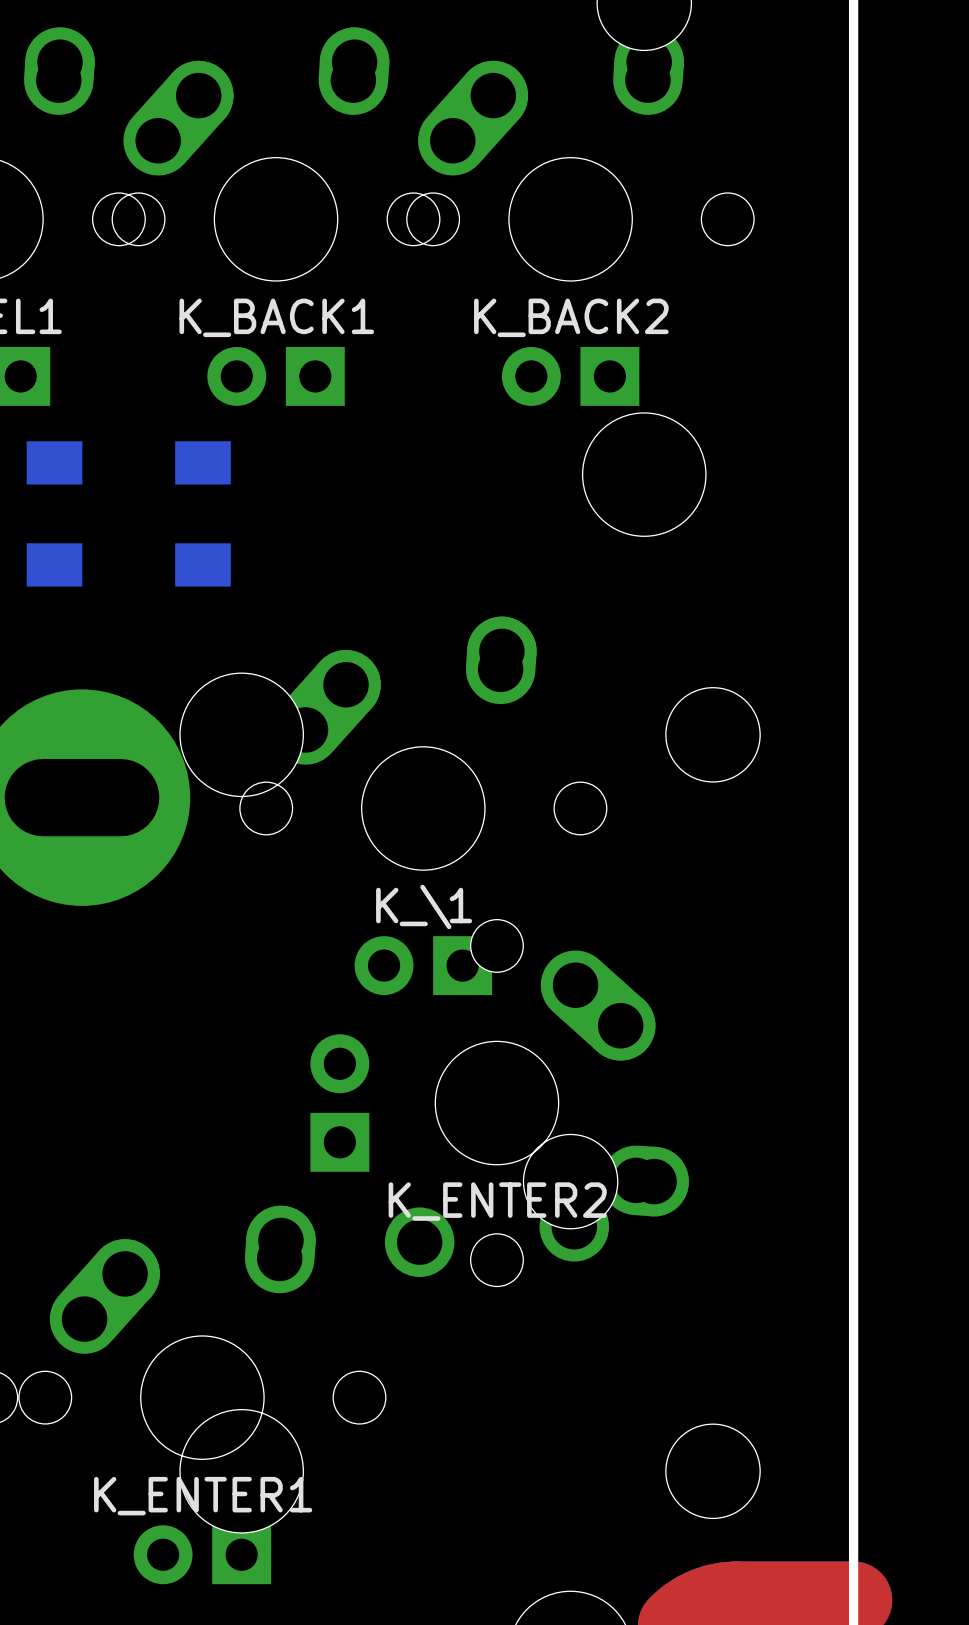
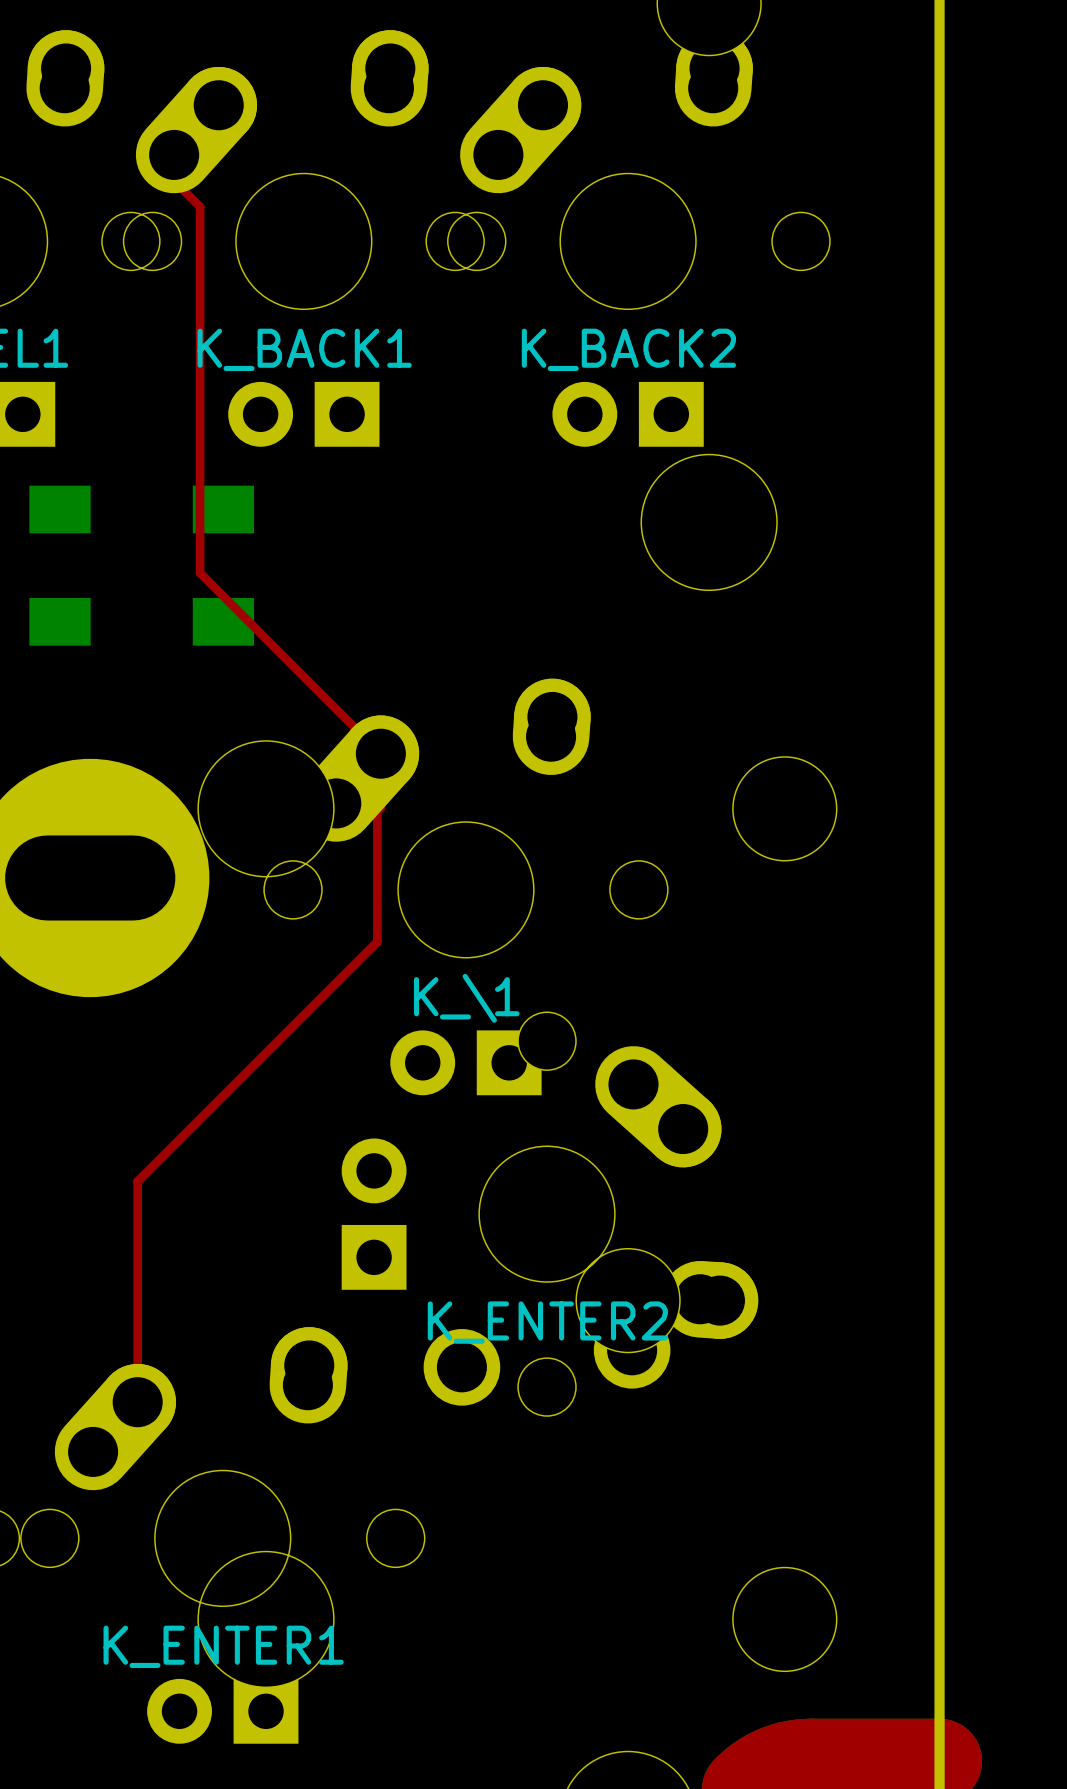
top track: none -> (174, 154) (174, 180) (200, 206) (200, 572) (380, 753) (380, 807) (377, 811) (377, 941) (137, 1181) (137, 1402)

